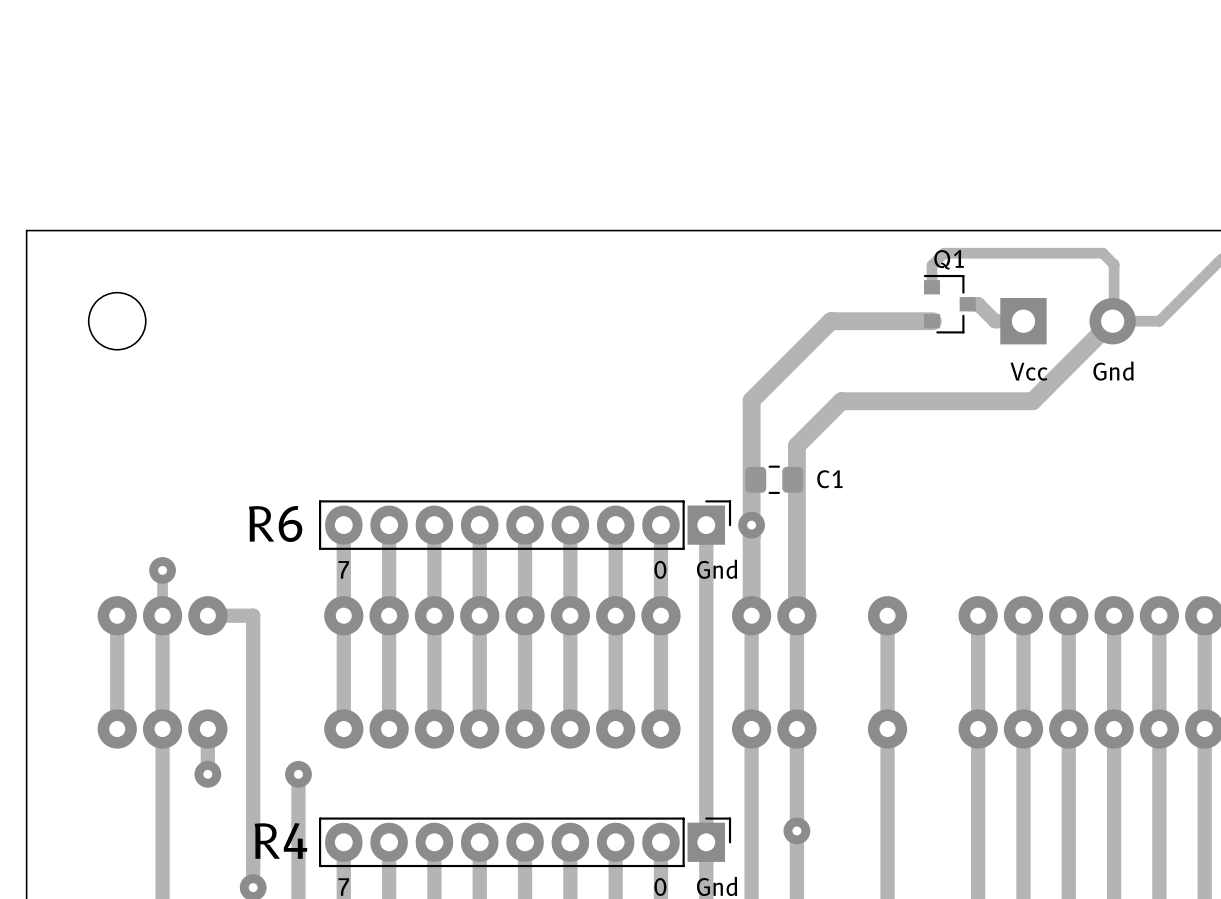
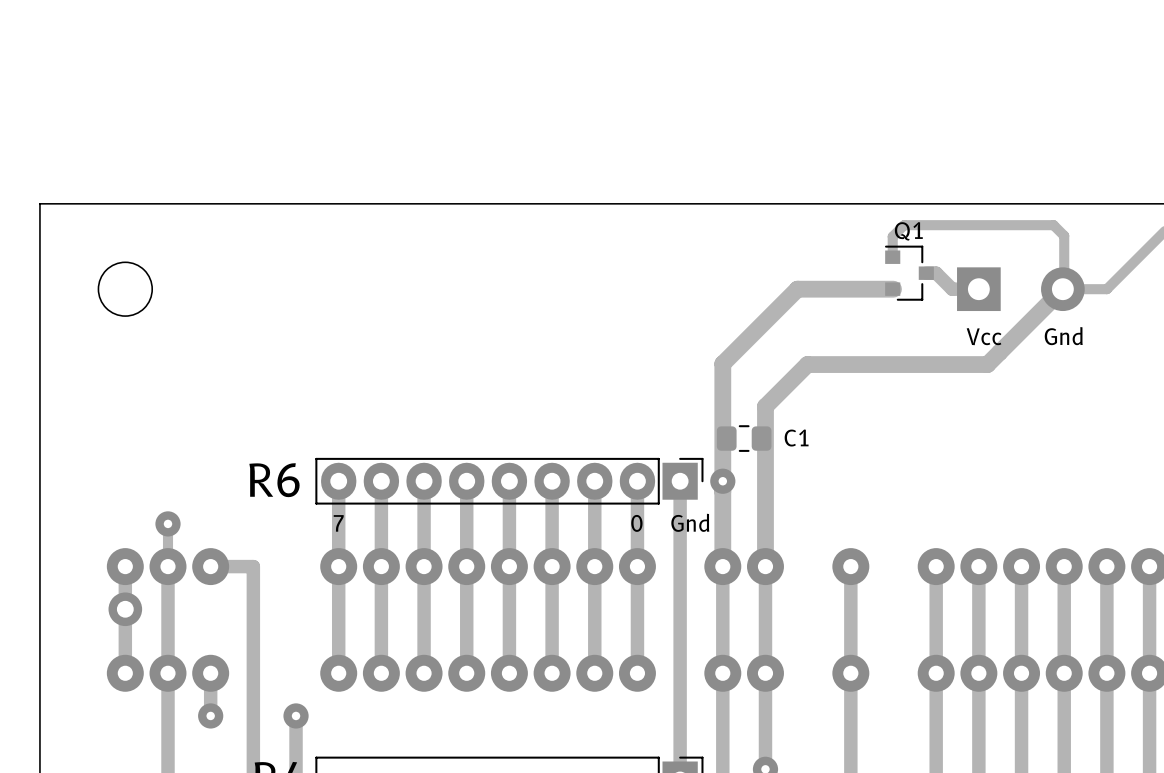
via: none -> (125, 609)

